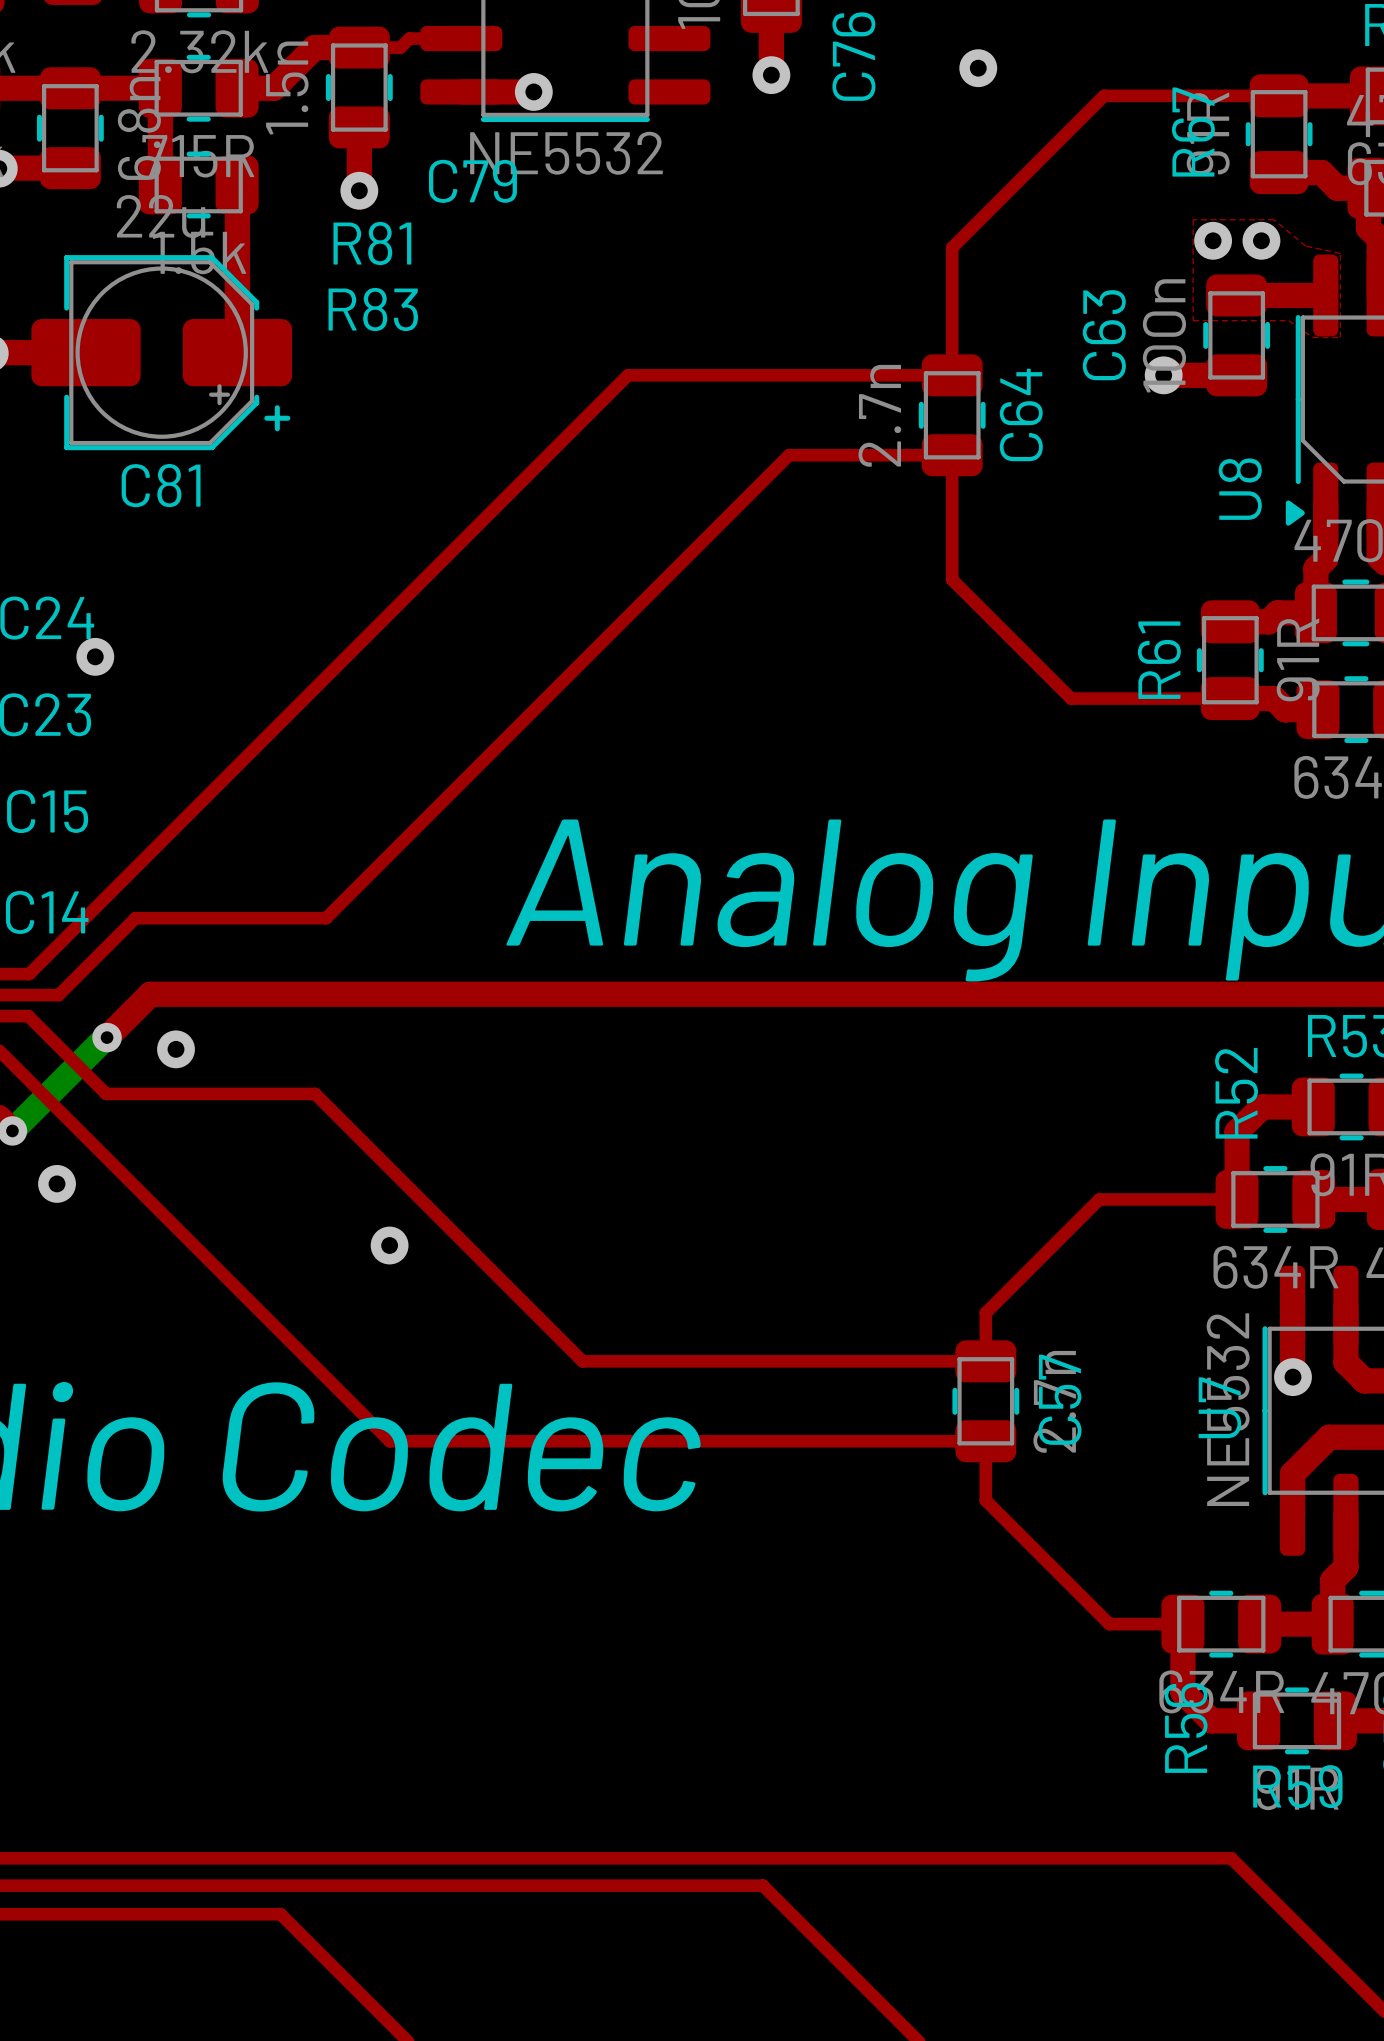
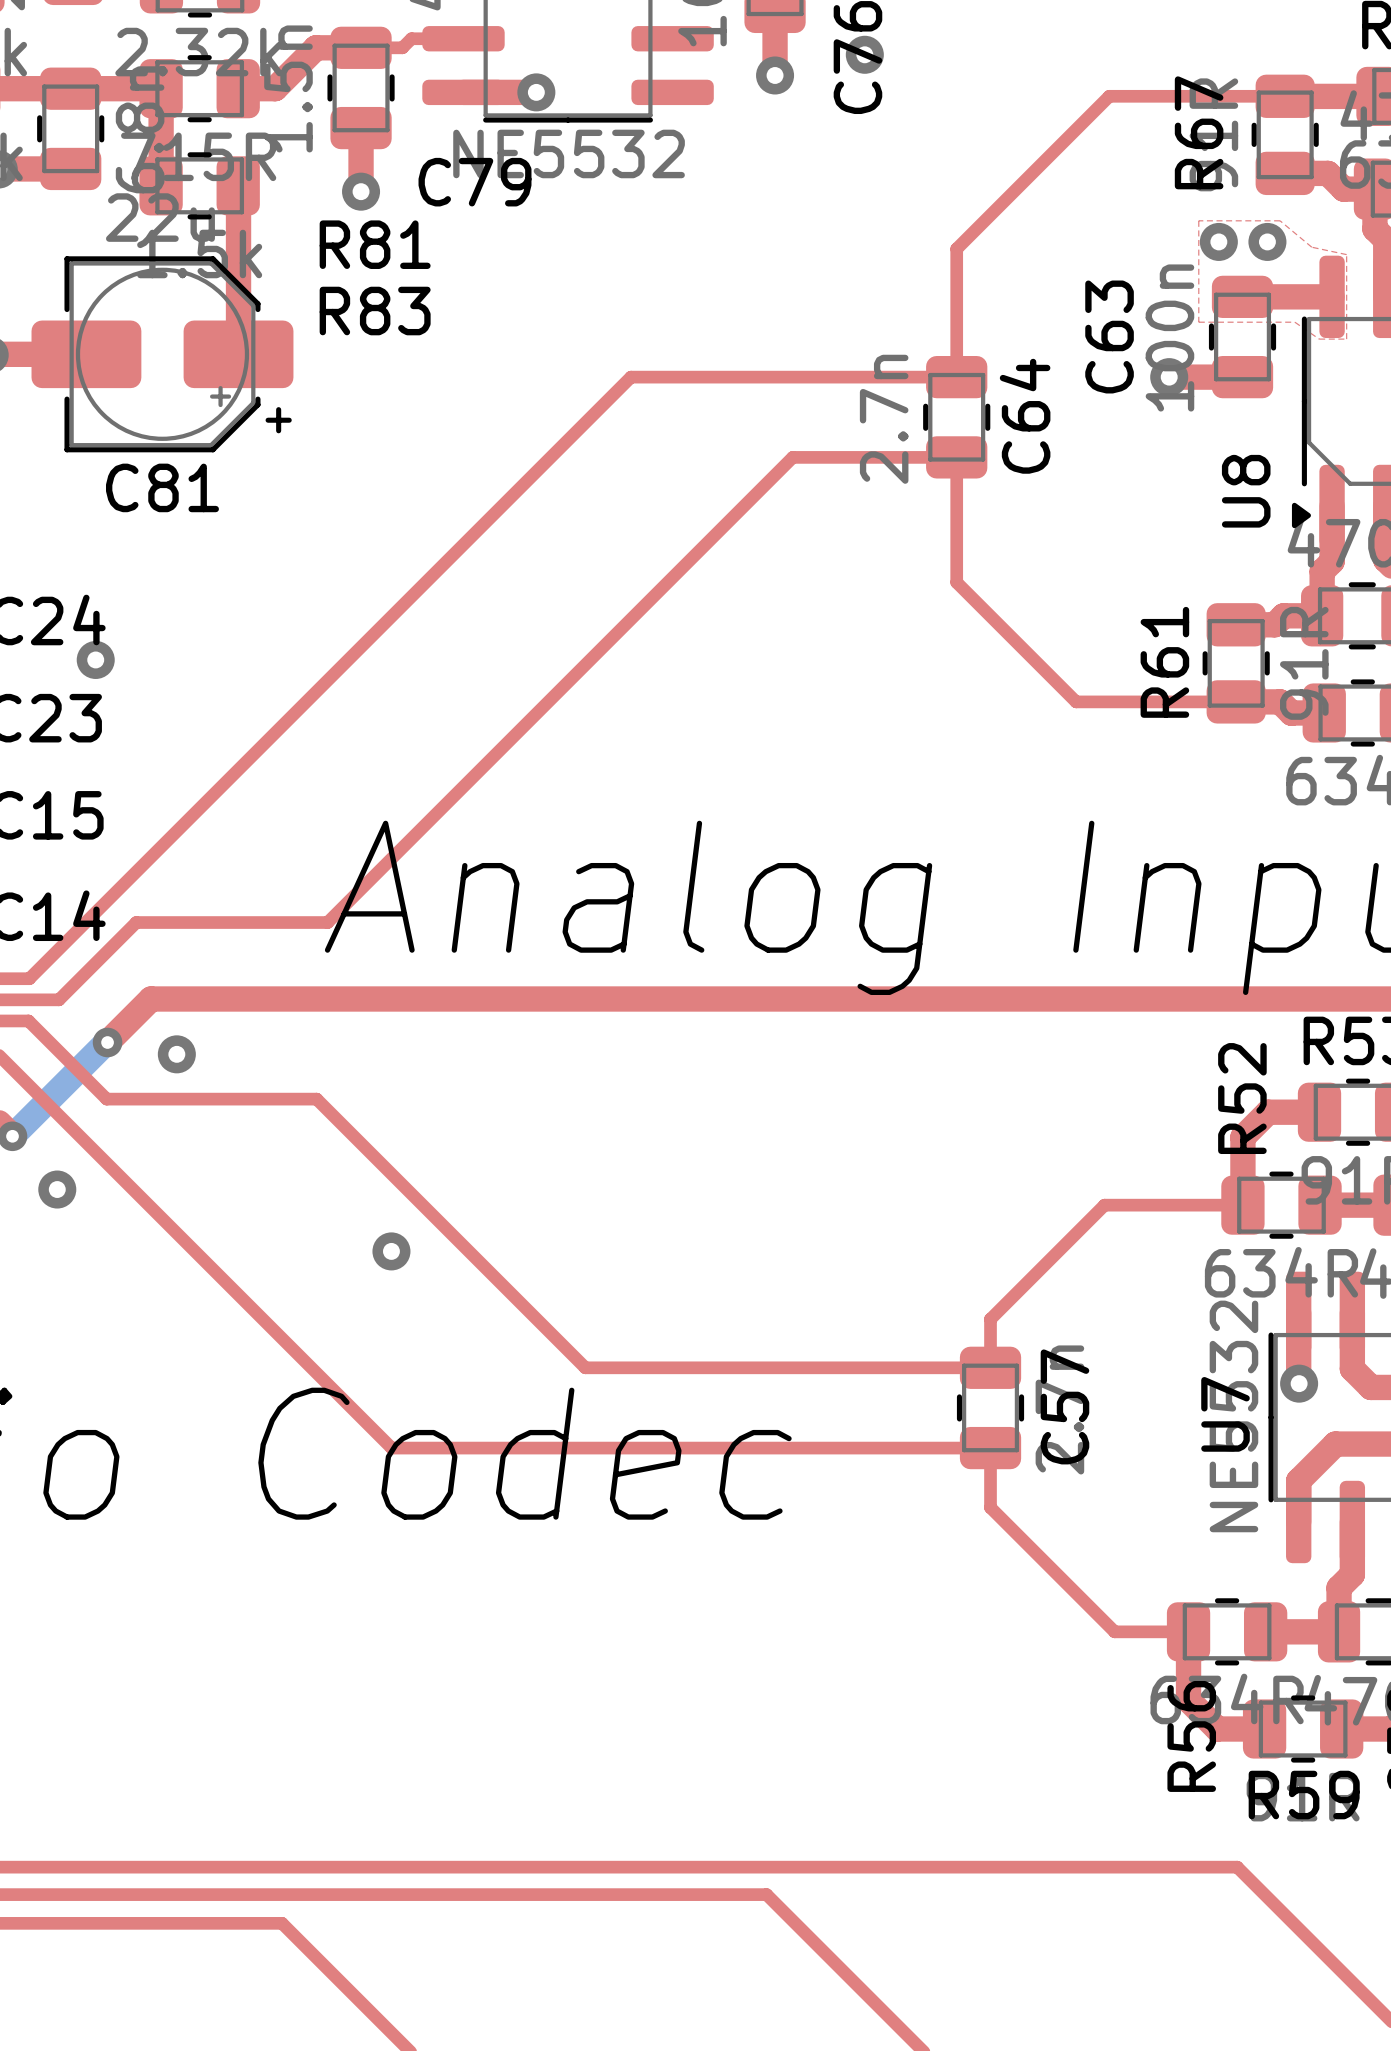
via position: (978, 68) -> (864, 54)

